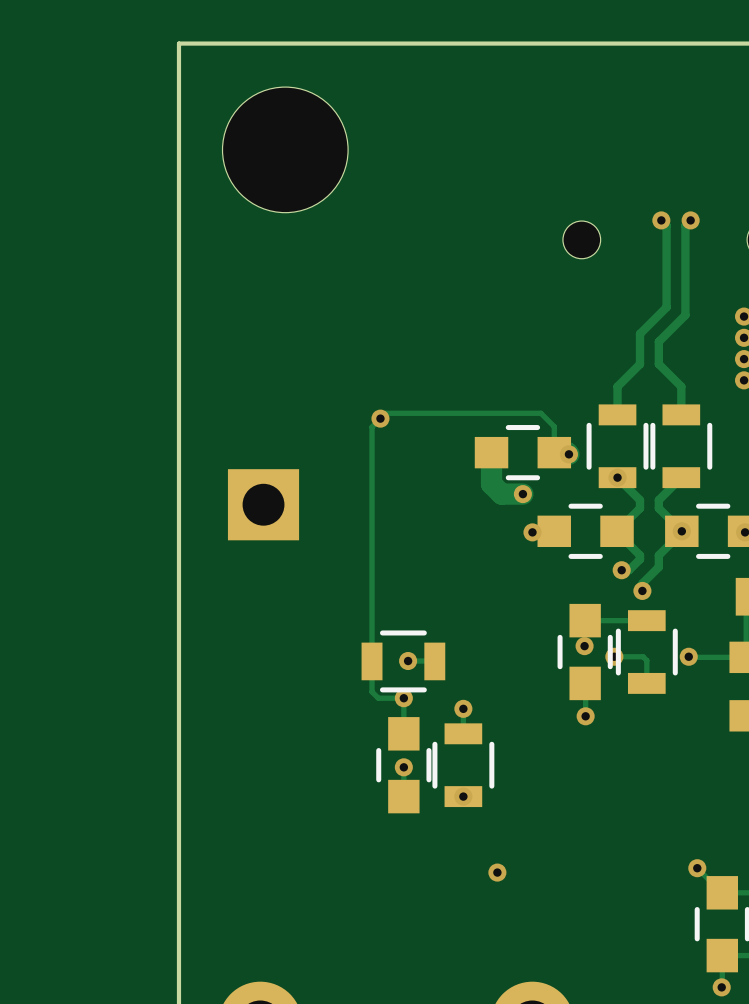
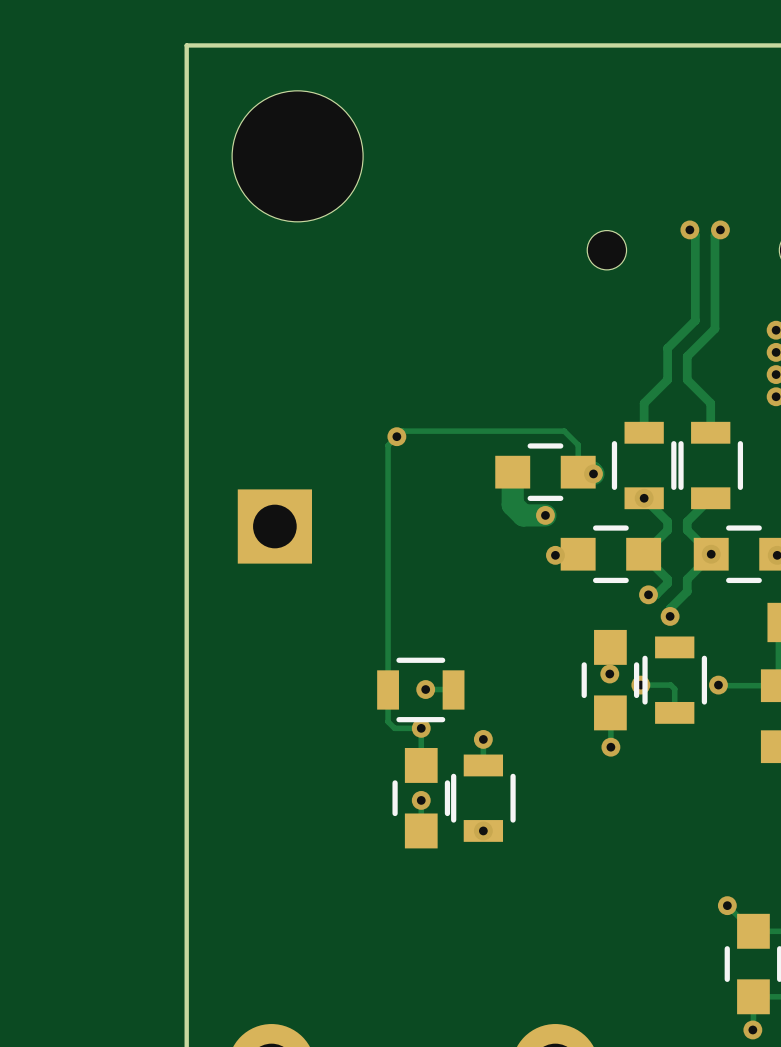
track: (646, 620) (585, 620) -> none
via: (497, 872) -> none

